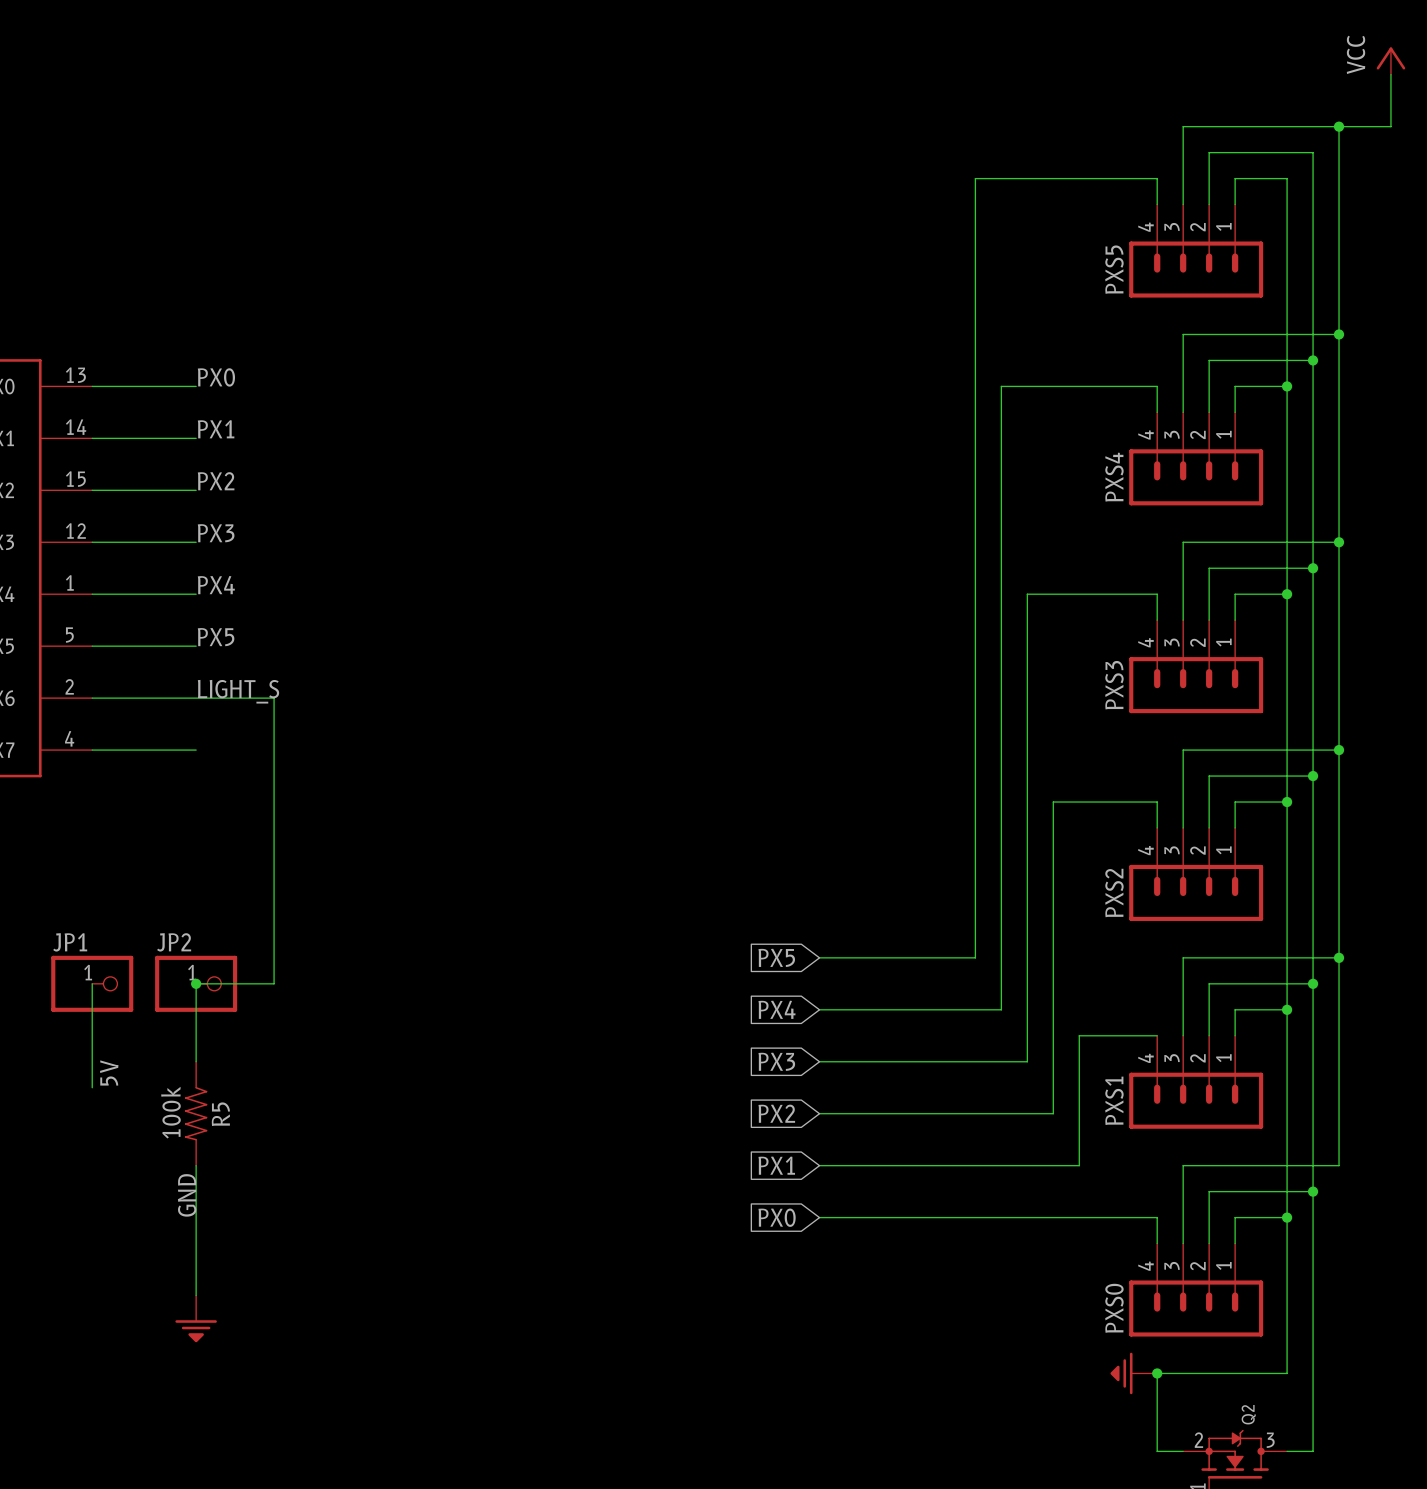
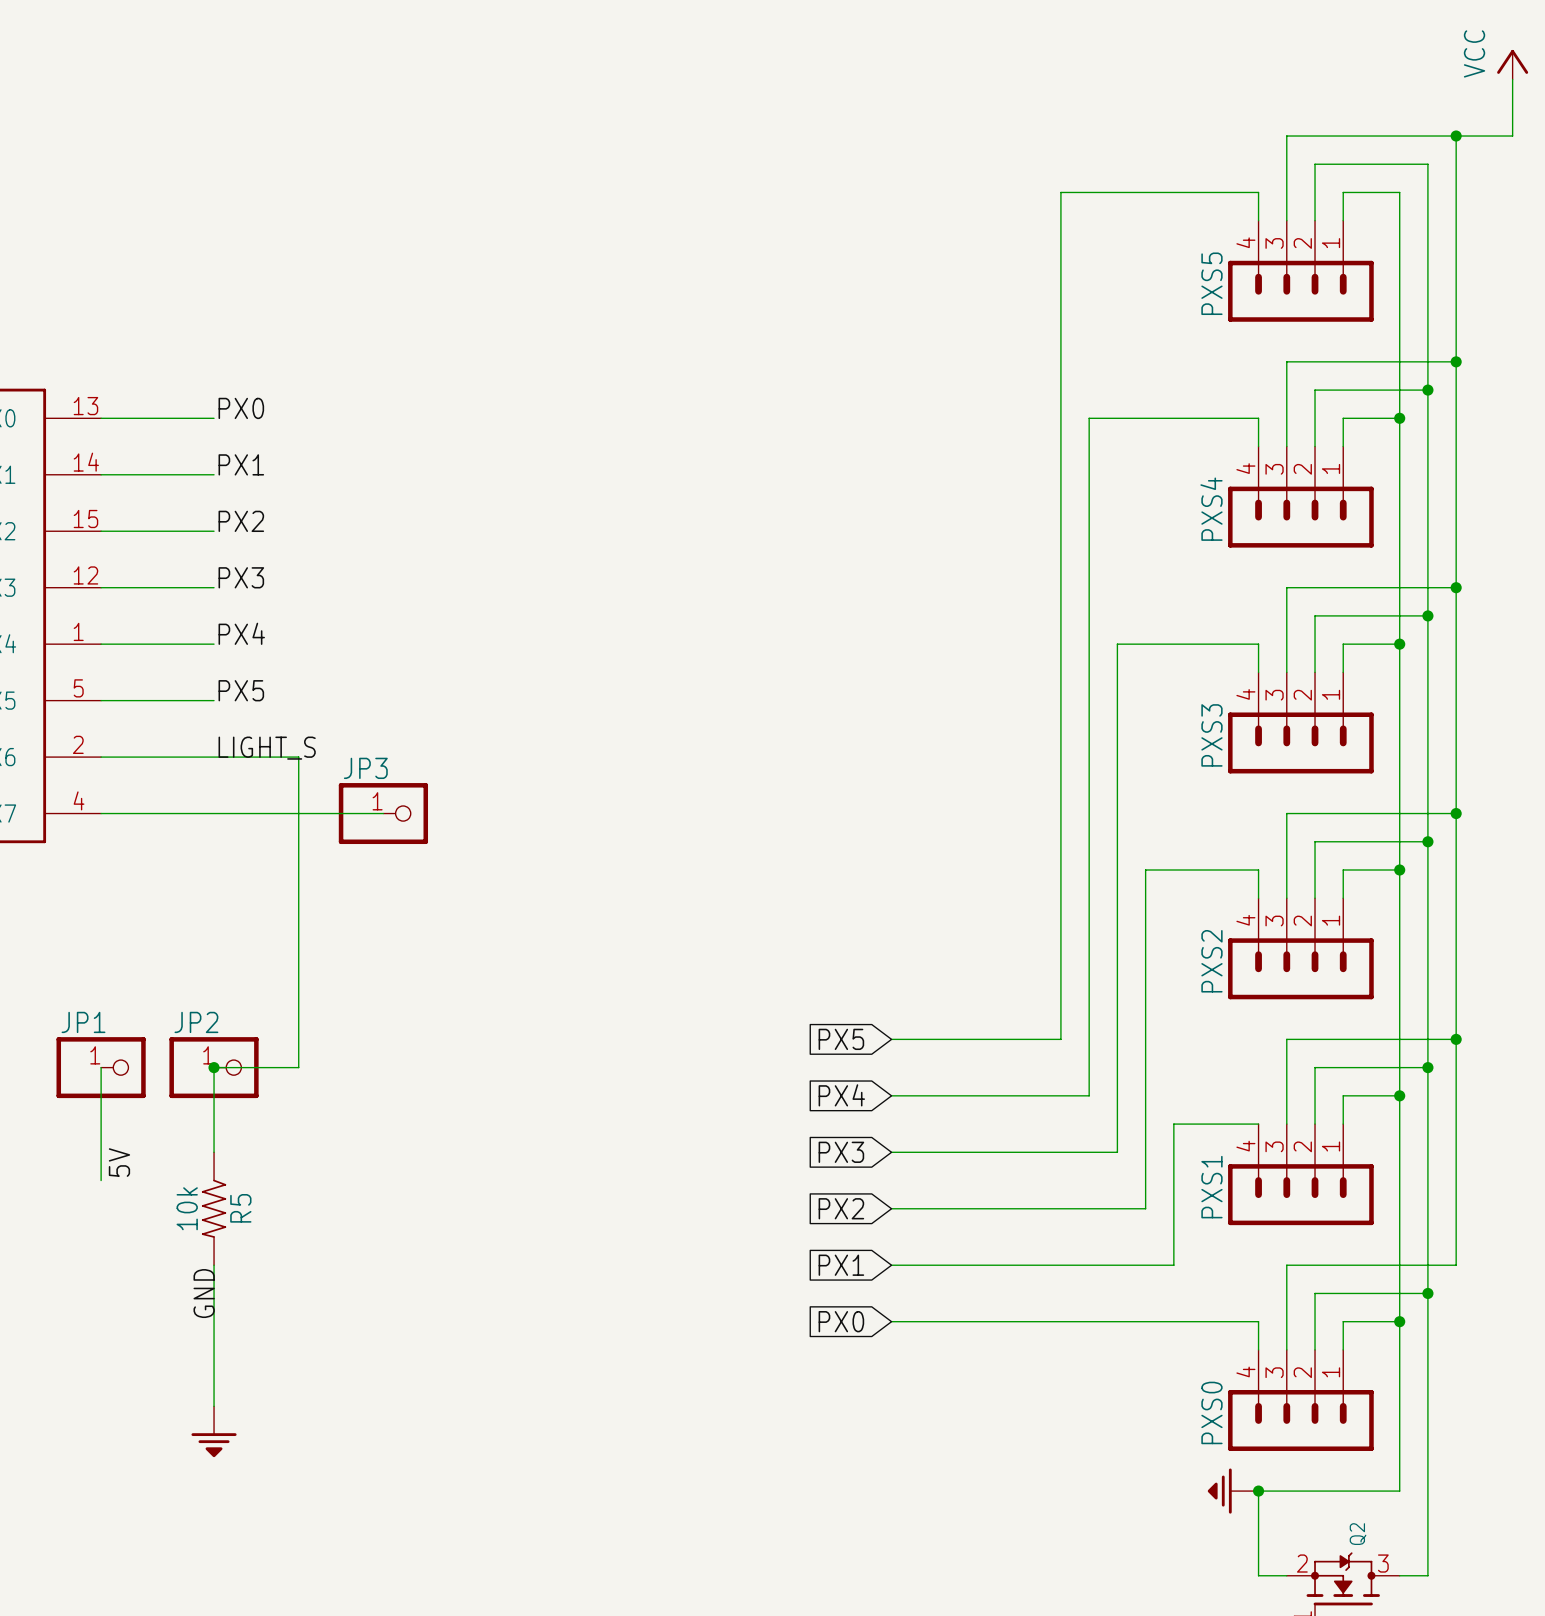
wire: none -> (214, 813) (383, 813)
JP3: none -> (383, 813)
R5 value: 100k (170, 1112) -> 10k (187, 1208)

